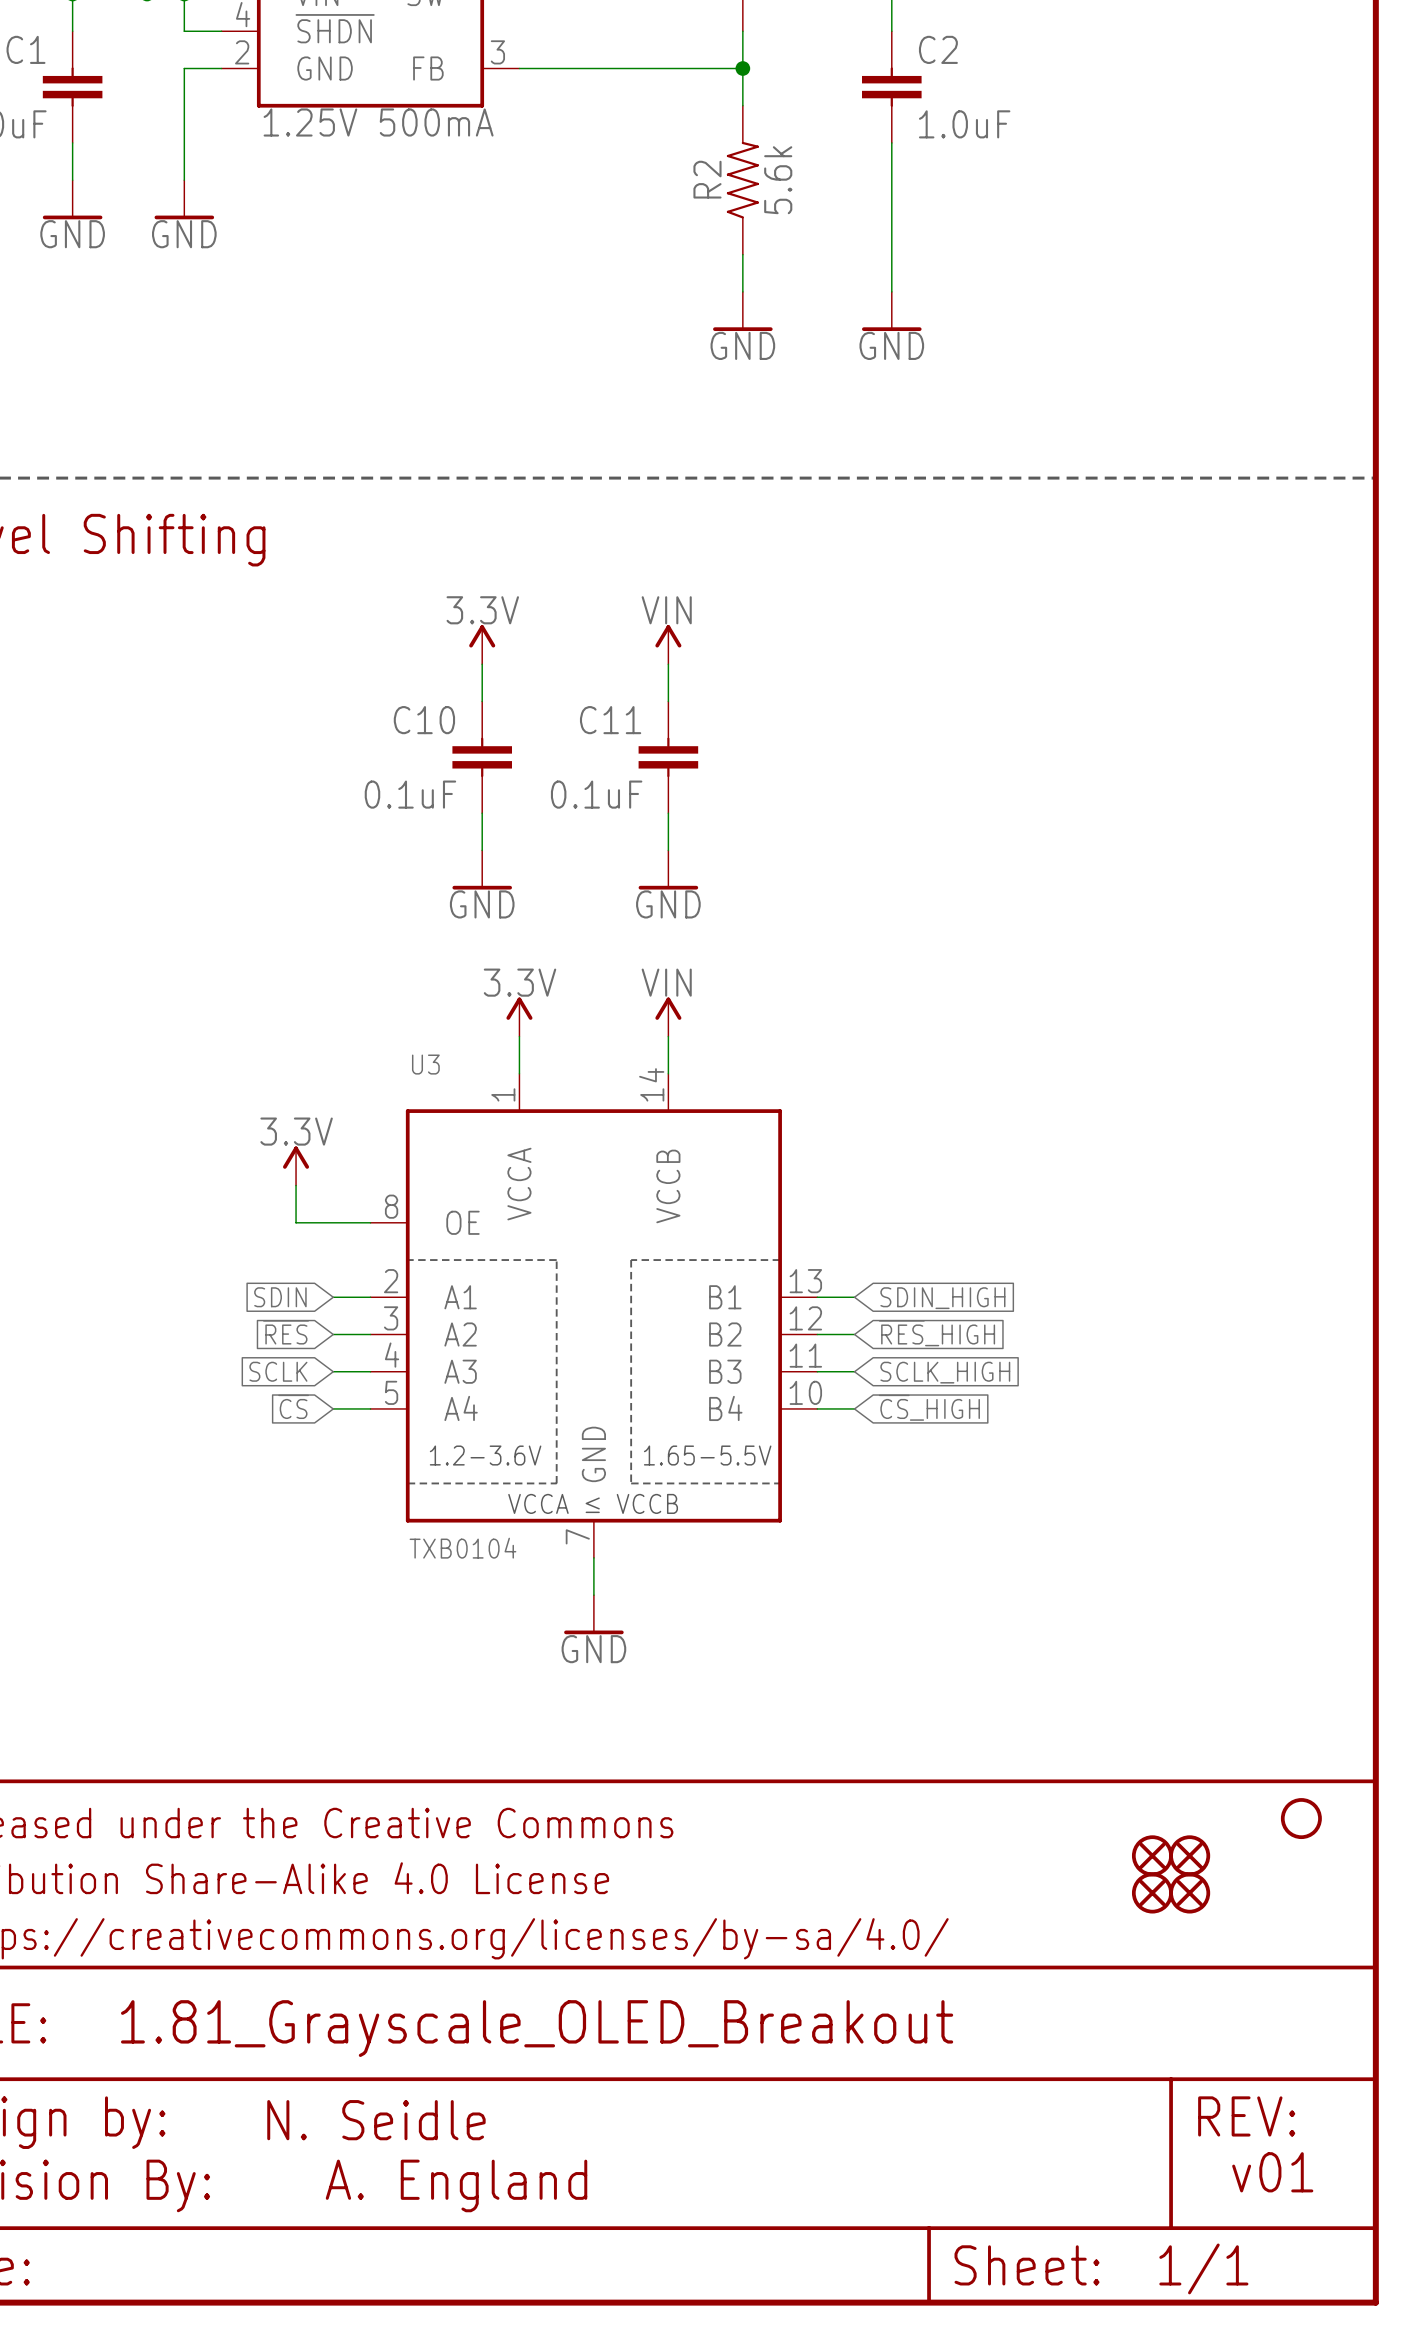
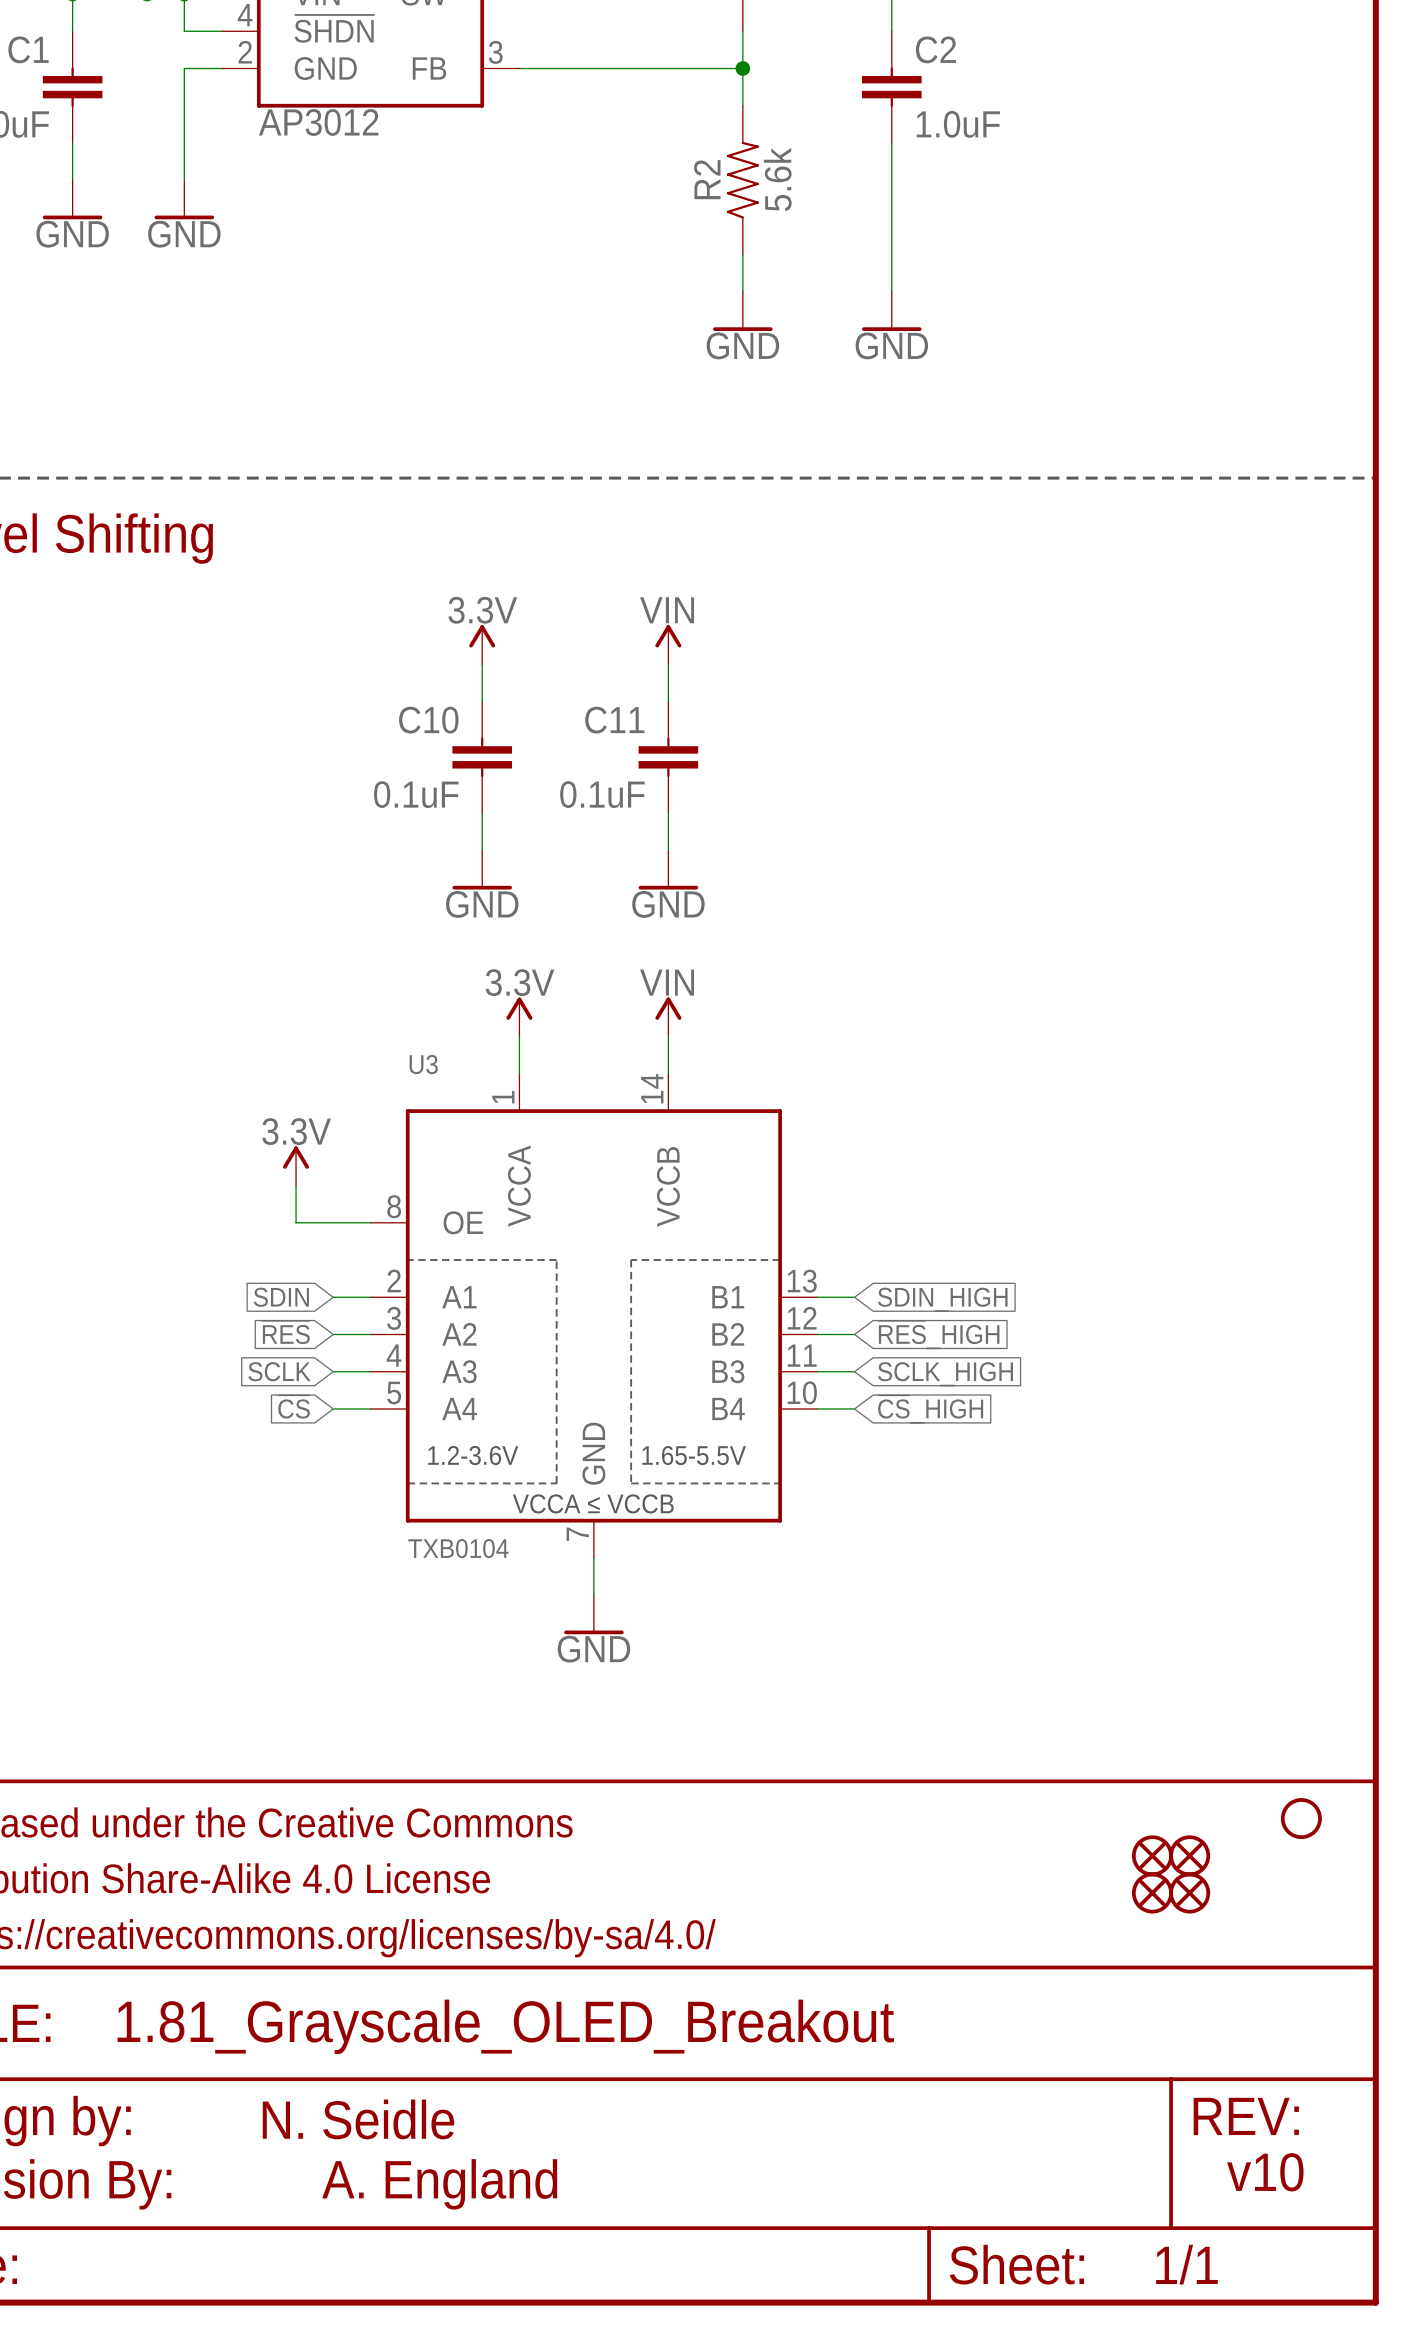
part value: 1.25V 500mA (378, 122) -> AP3012 (318, 122)
text: v01 (1272, 2172) -> v10 (1265, 2172)

